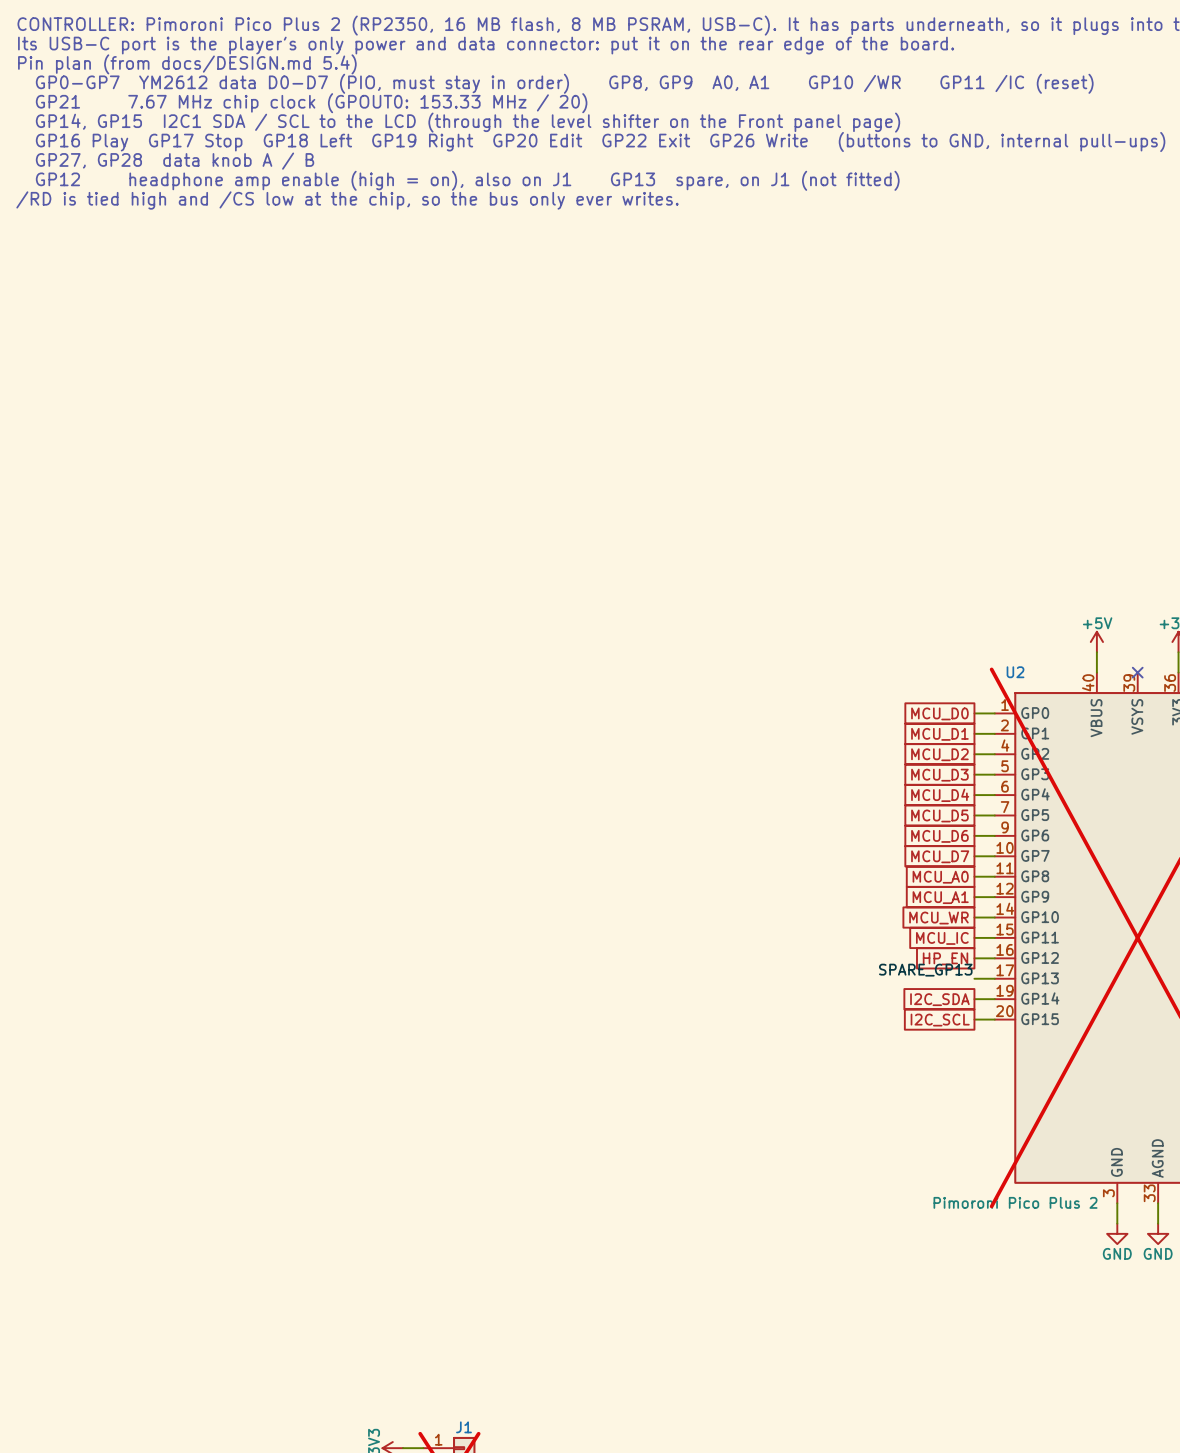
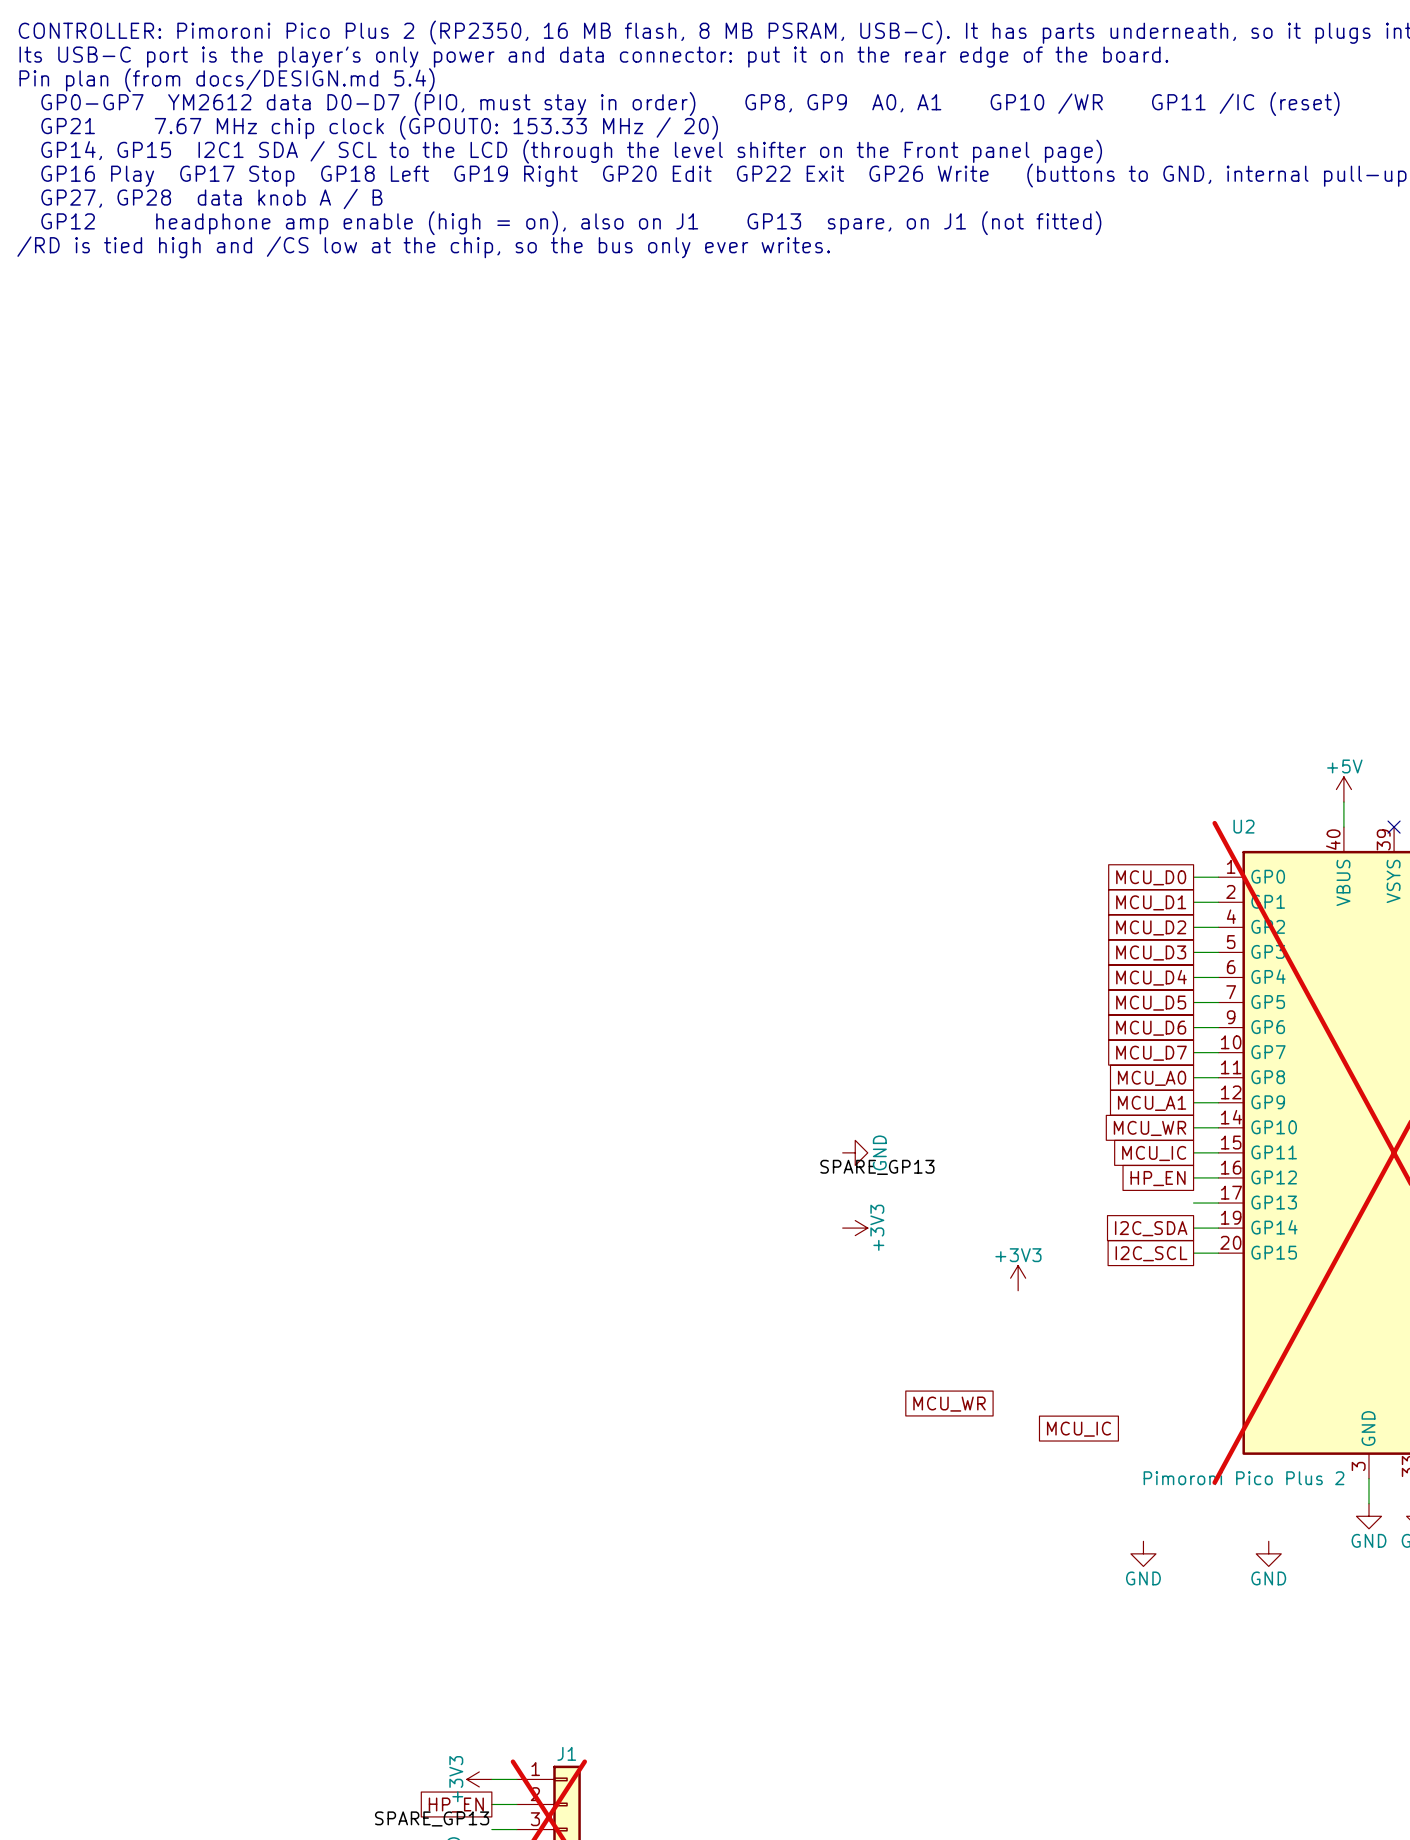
power symbol: none -> GND (855, 1152)
label: none -> SPARE_GP13 (877, 1167)
label: SPARE_GP13 (925, 970) -> none
power symbol: none -> +3V3 (855, 1228)
power symbol: none -> +3V3 (1018, 1278)
global label: none -> MCU_WR (949, 1404)
global label: none -> MCU_IC (1078, 1429)
power symbol: none -> GND (1143, 1553)
power symbol: none -> GND (1268, 1553)

